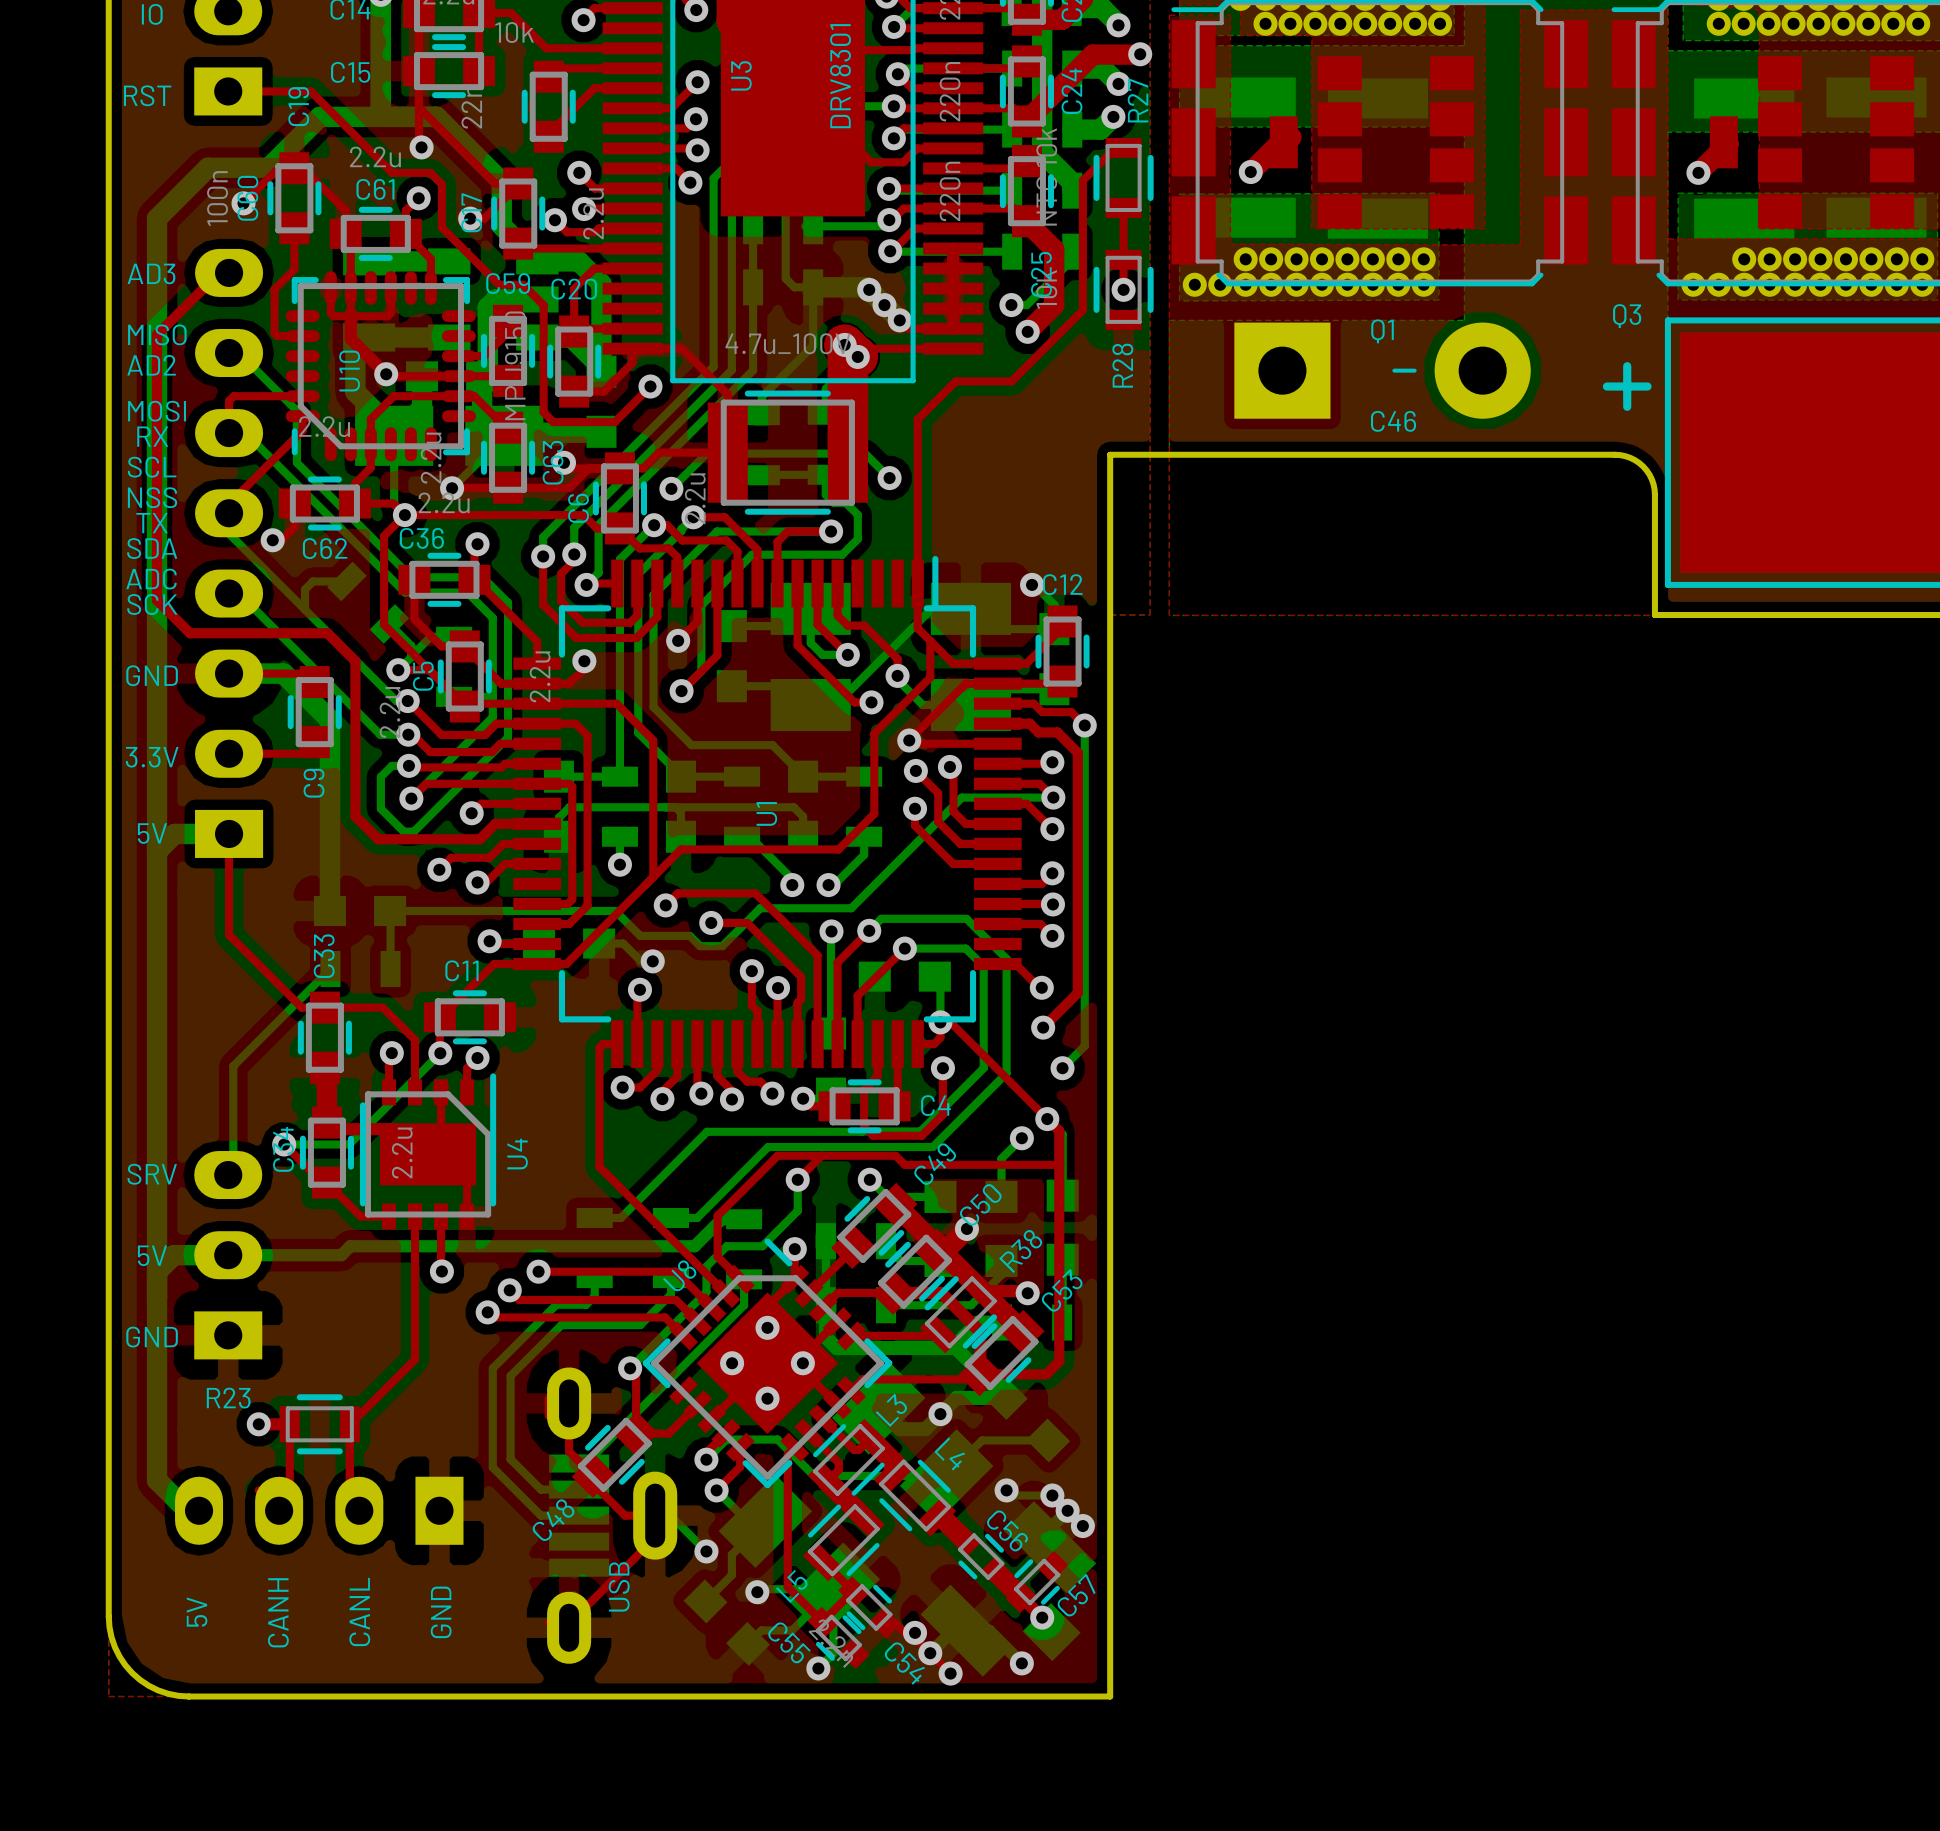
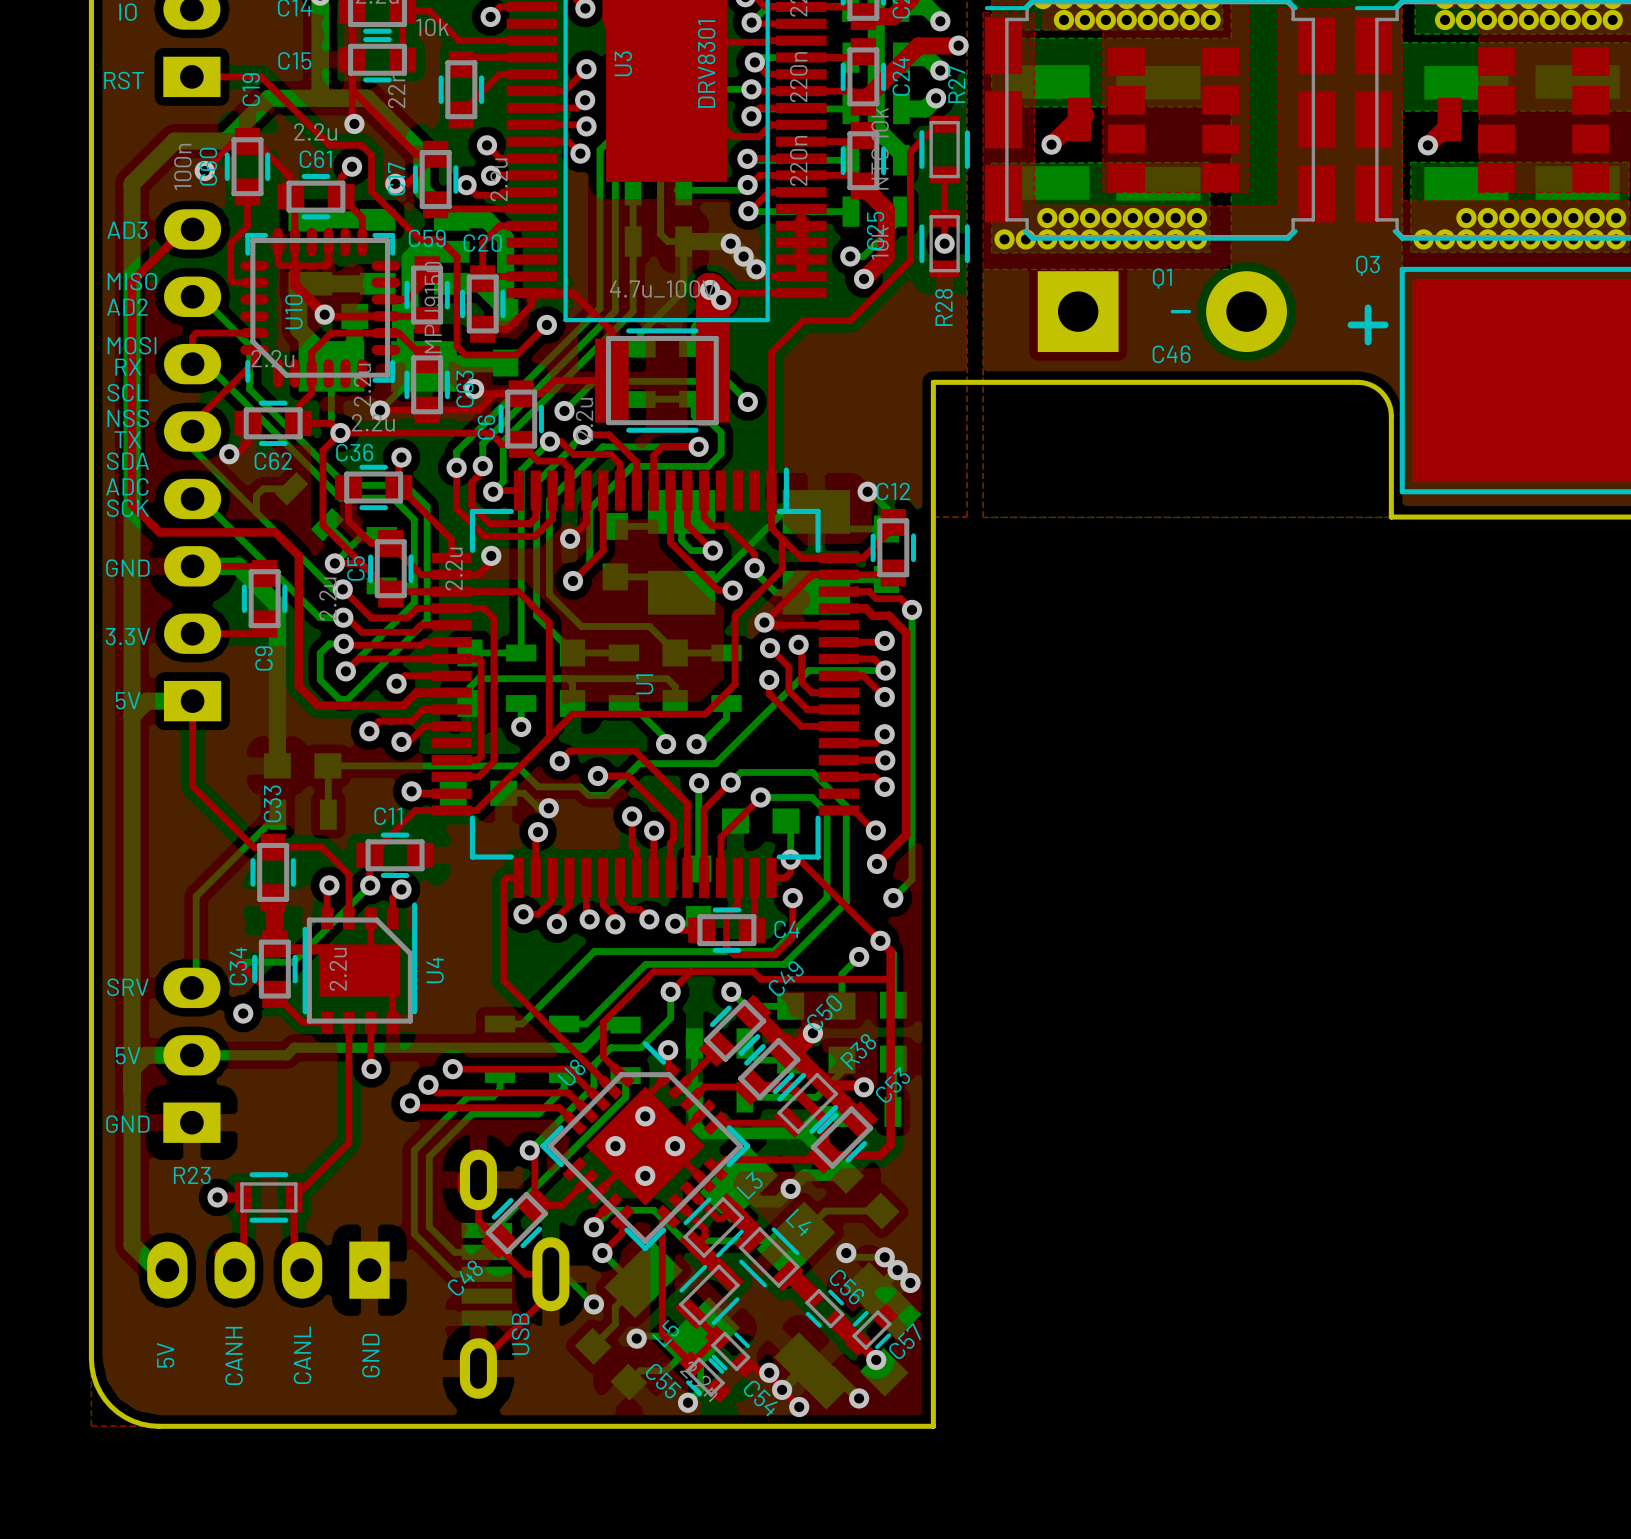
via position: (284, 1144) -> (243, 1013)

